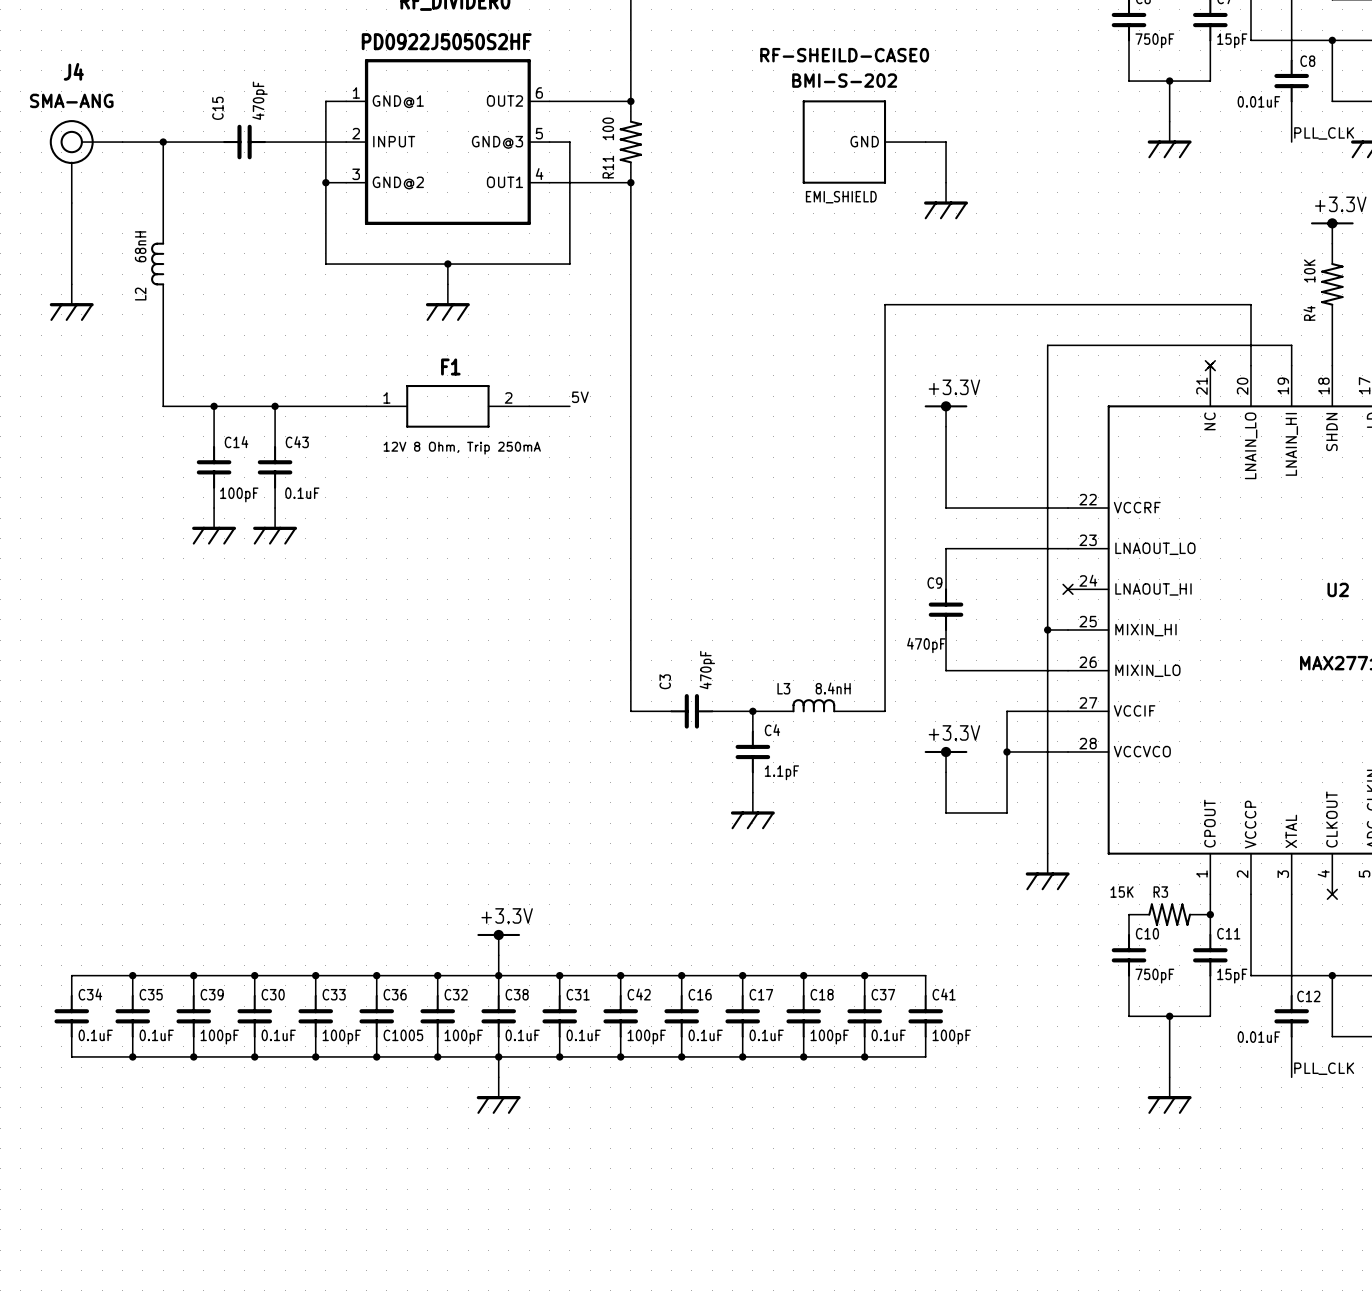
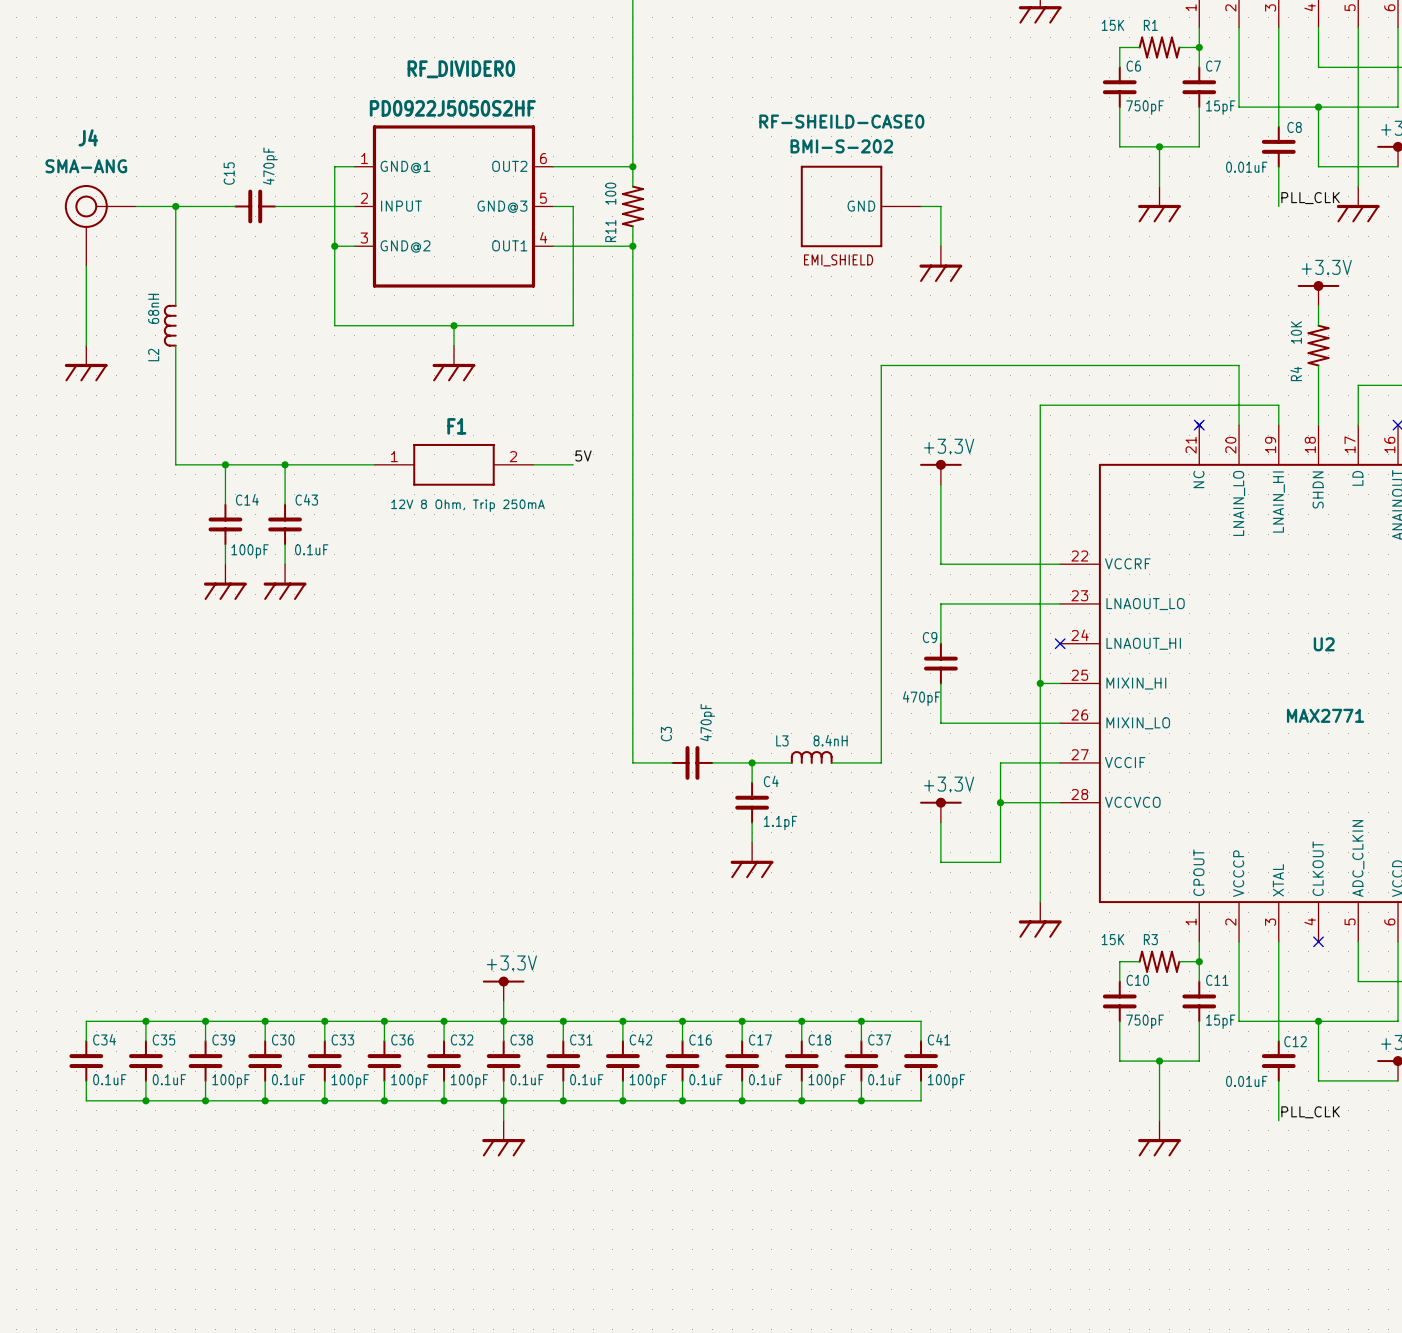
C36 value: C1005 (403, 1035) -> 100pF (409, 1081)

